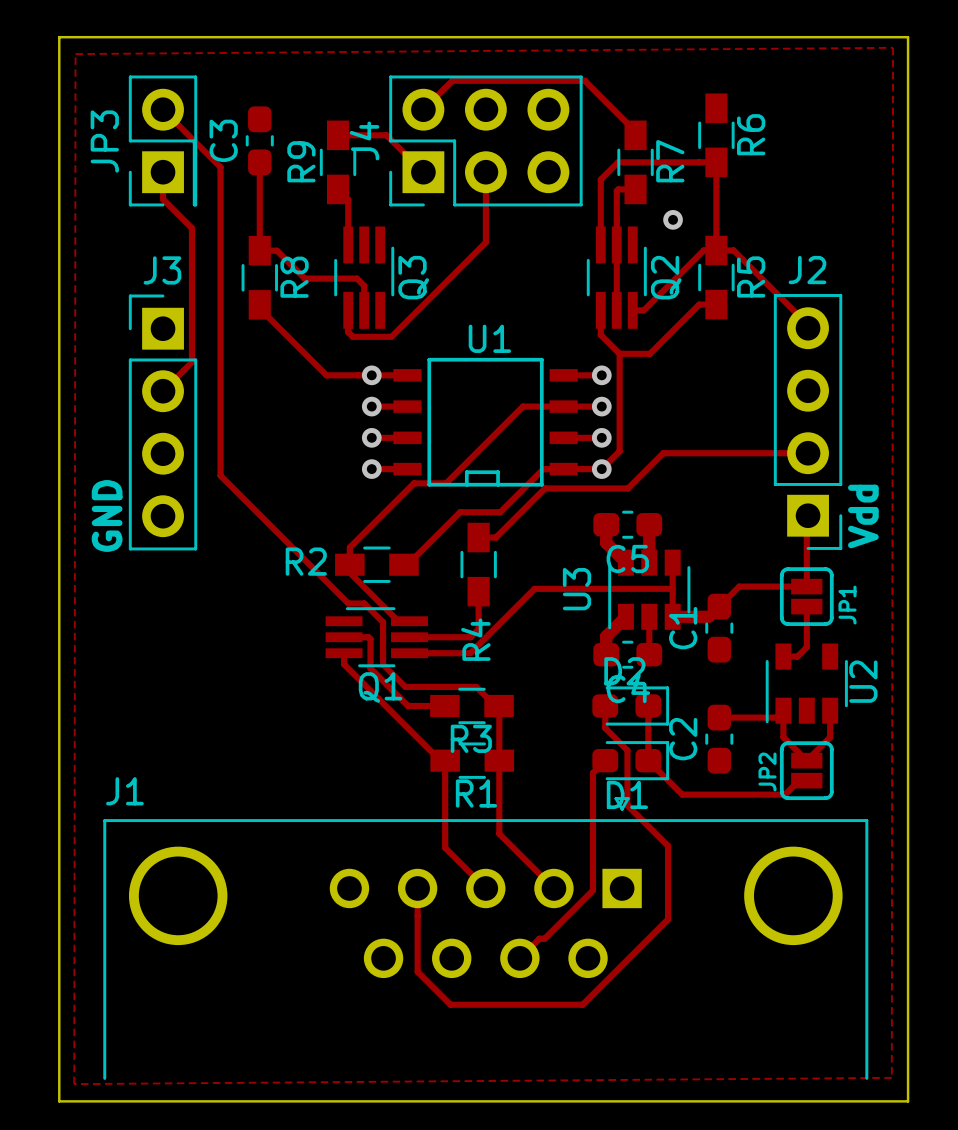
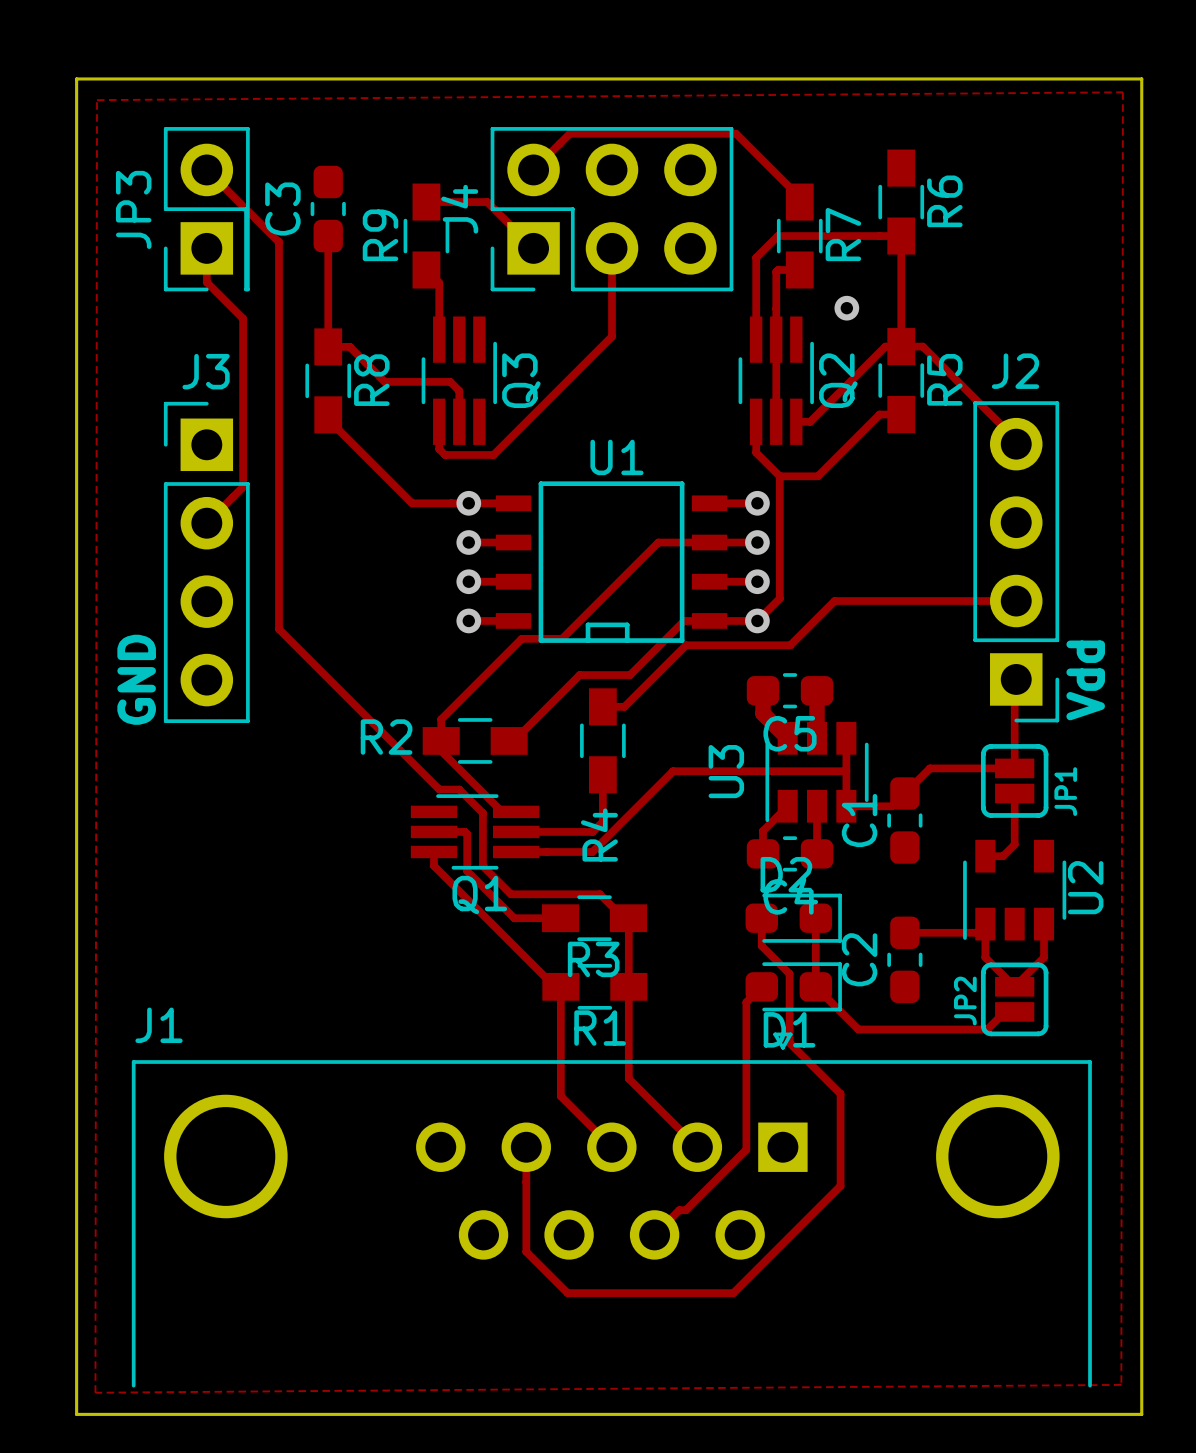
track width: thick (625, 616) (606, 636) (606, 654) -> thin (787, 806) (762, 830) (762, 853)
track width: thick (672, 616) (709, 616) -> thin (846, 806) (892, 806)

